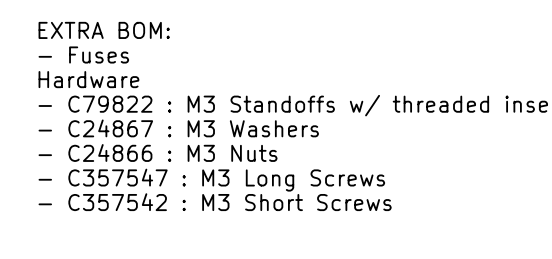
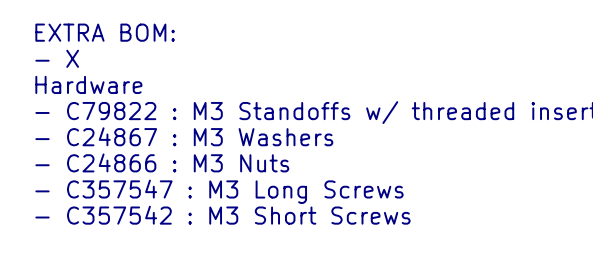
text: - Fuses (83, 55) -> - X (57, 58)

